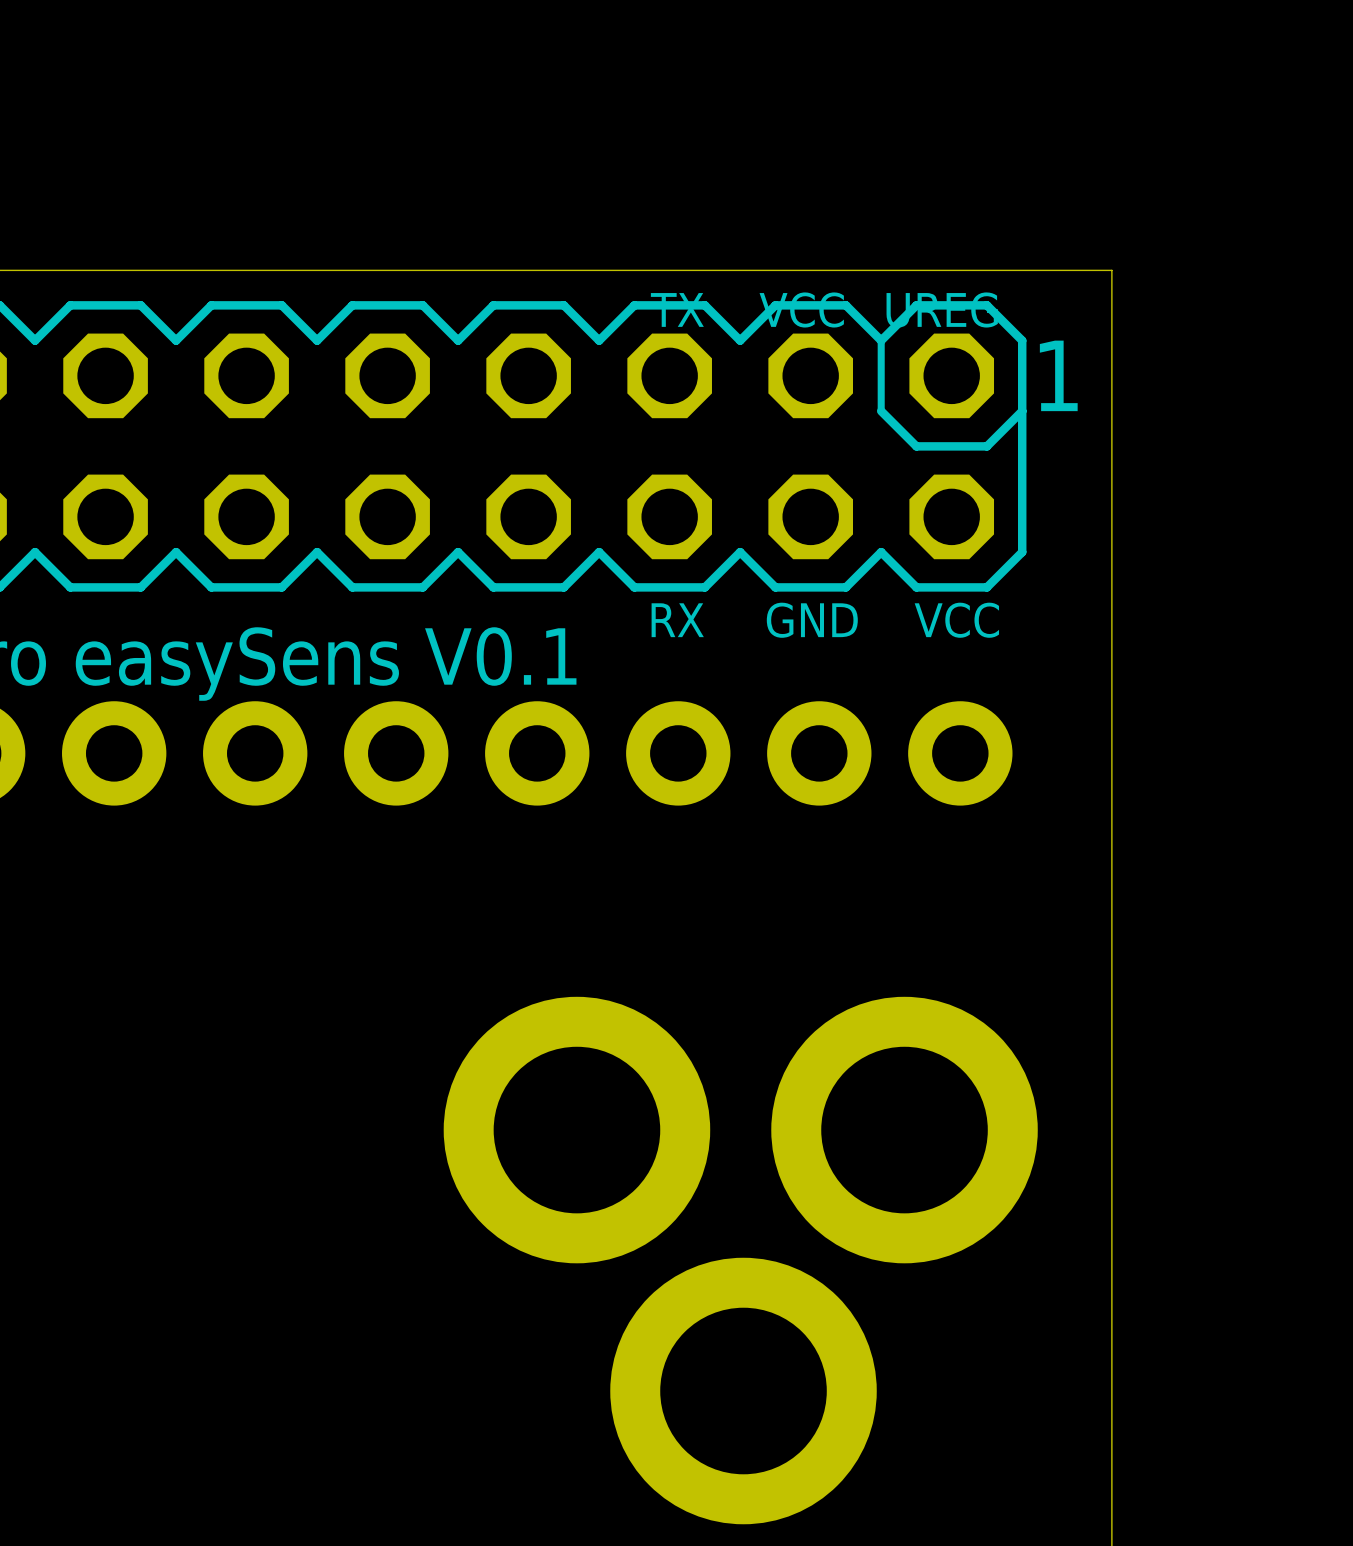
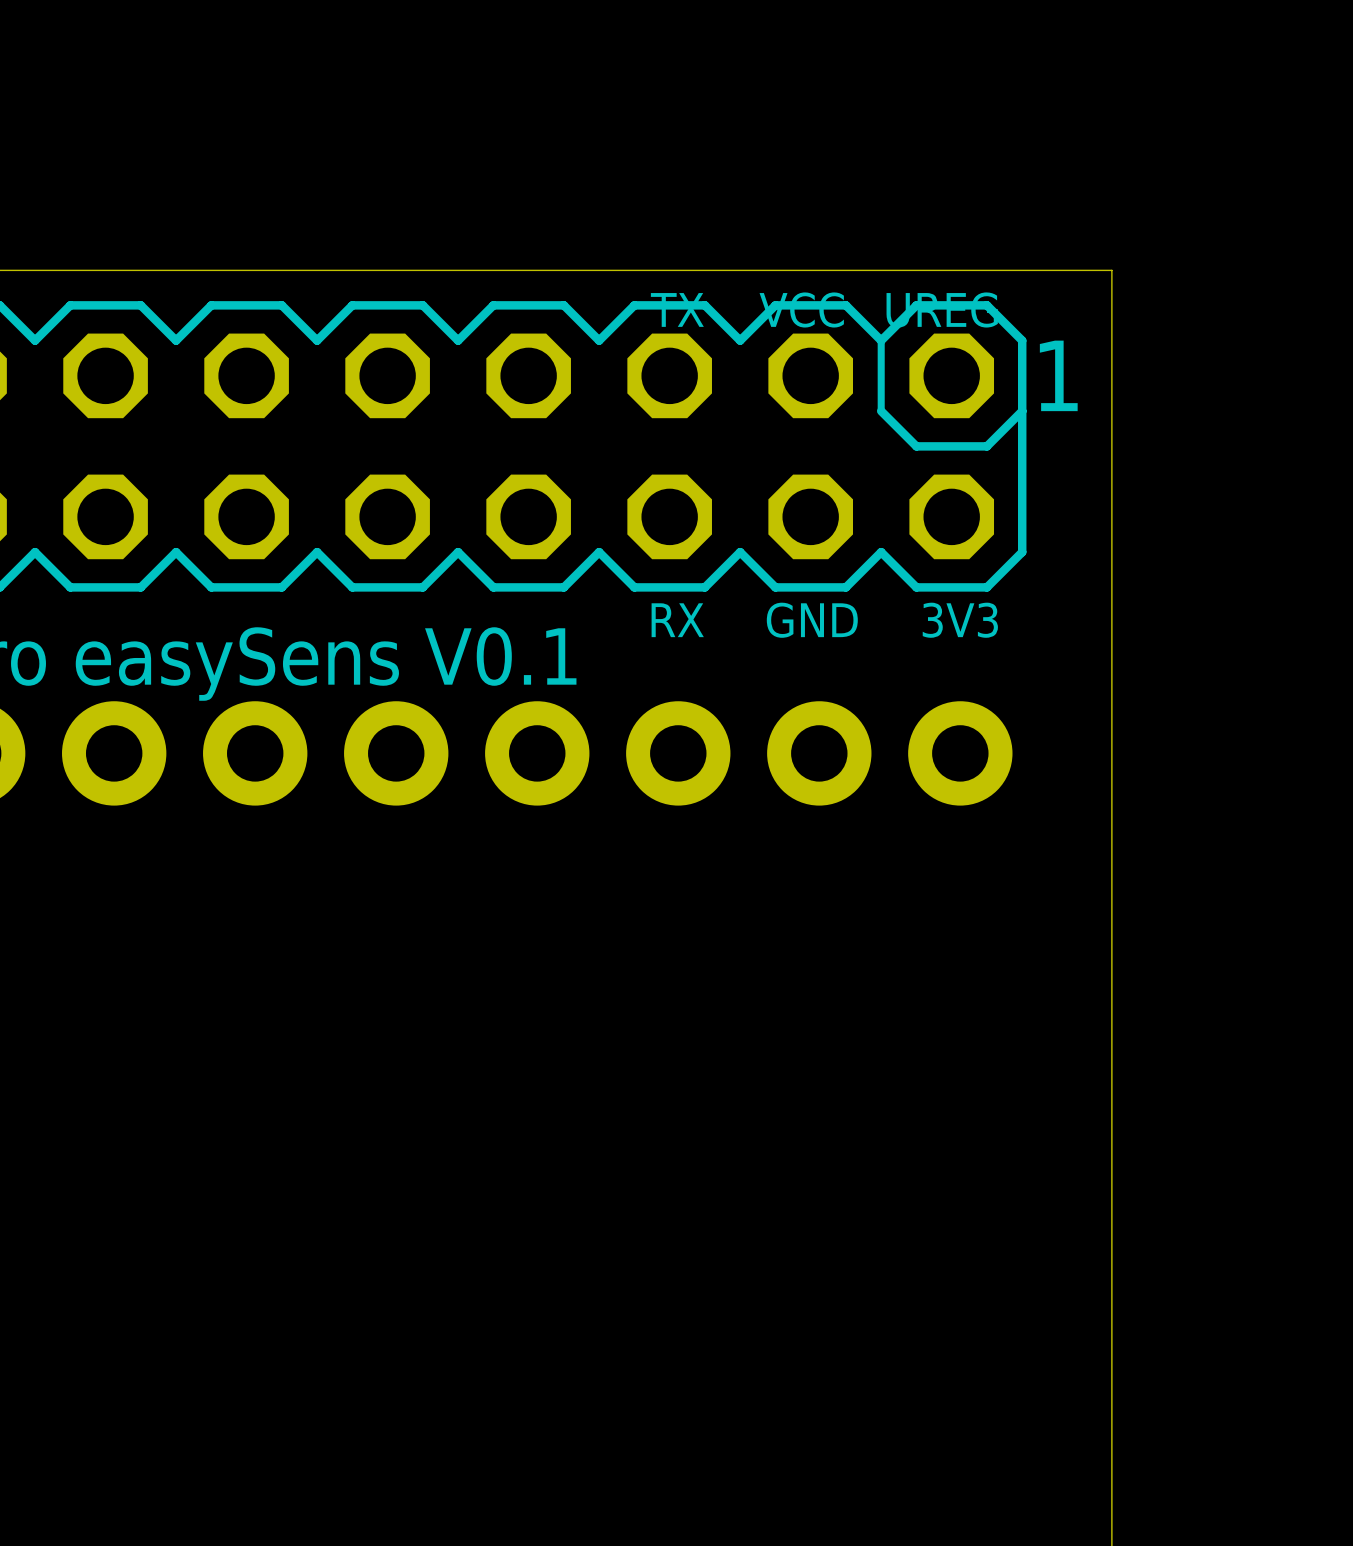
text: VCC (956, 620) -> 3V3 (960, 620)
part: (740, 1260) -> none

